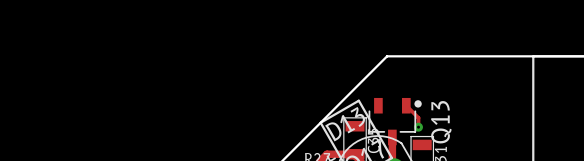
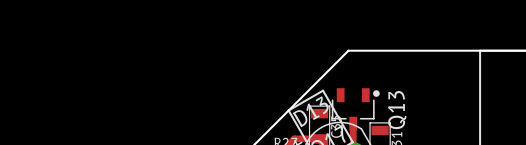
track: (406, 105) (418, 117) (418, 127) -> none
via: (418, 127) -> none

